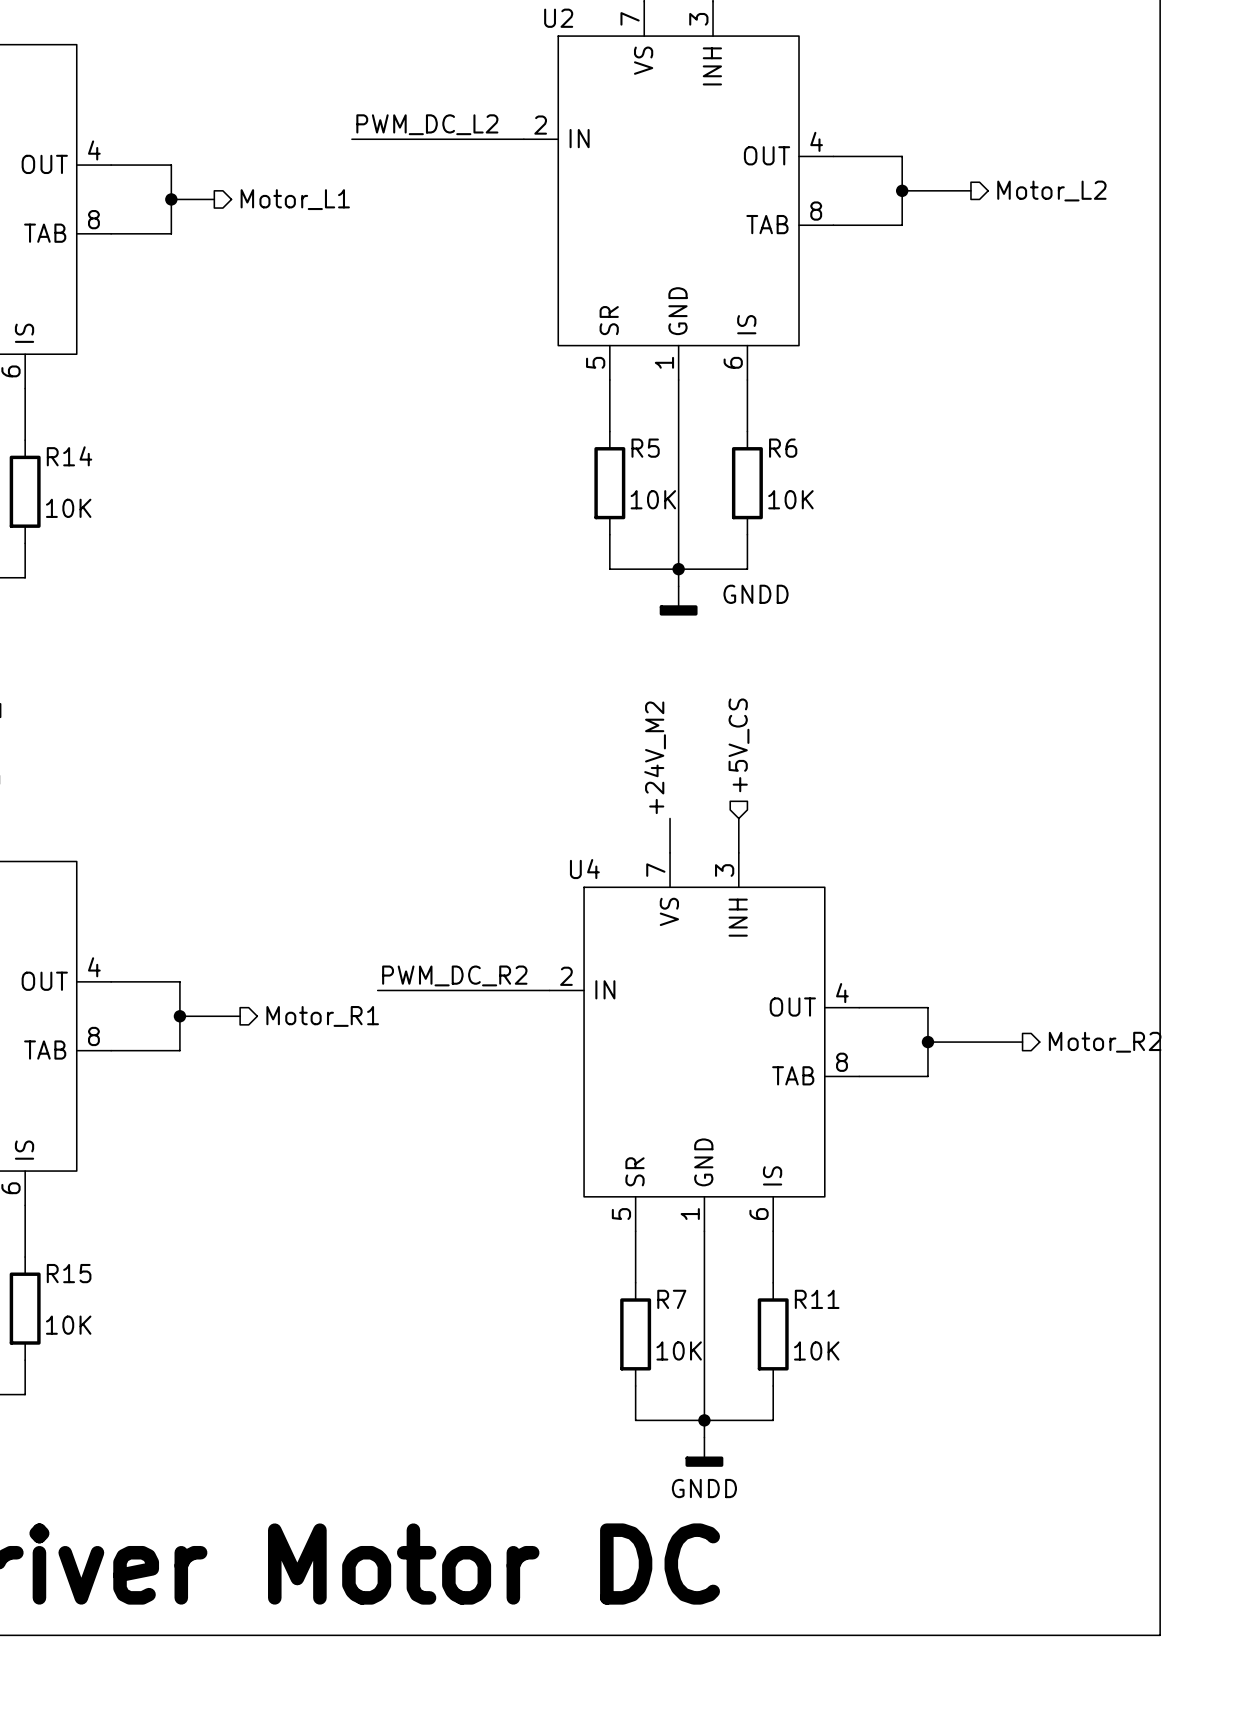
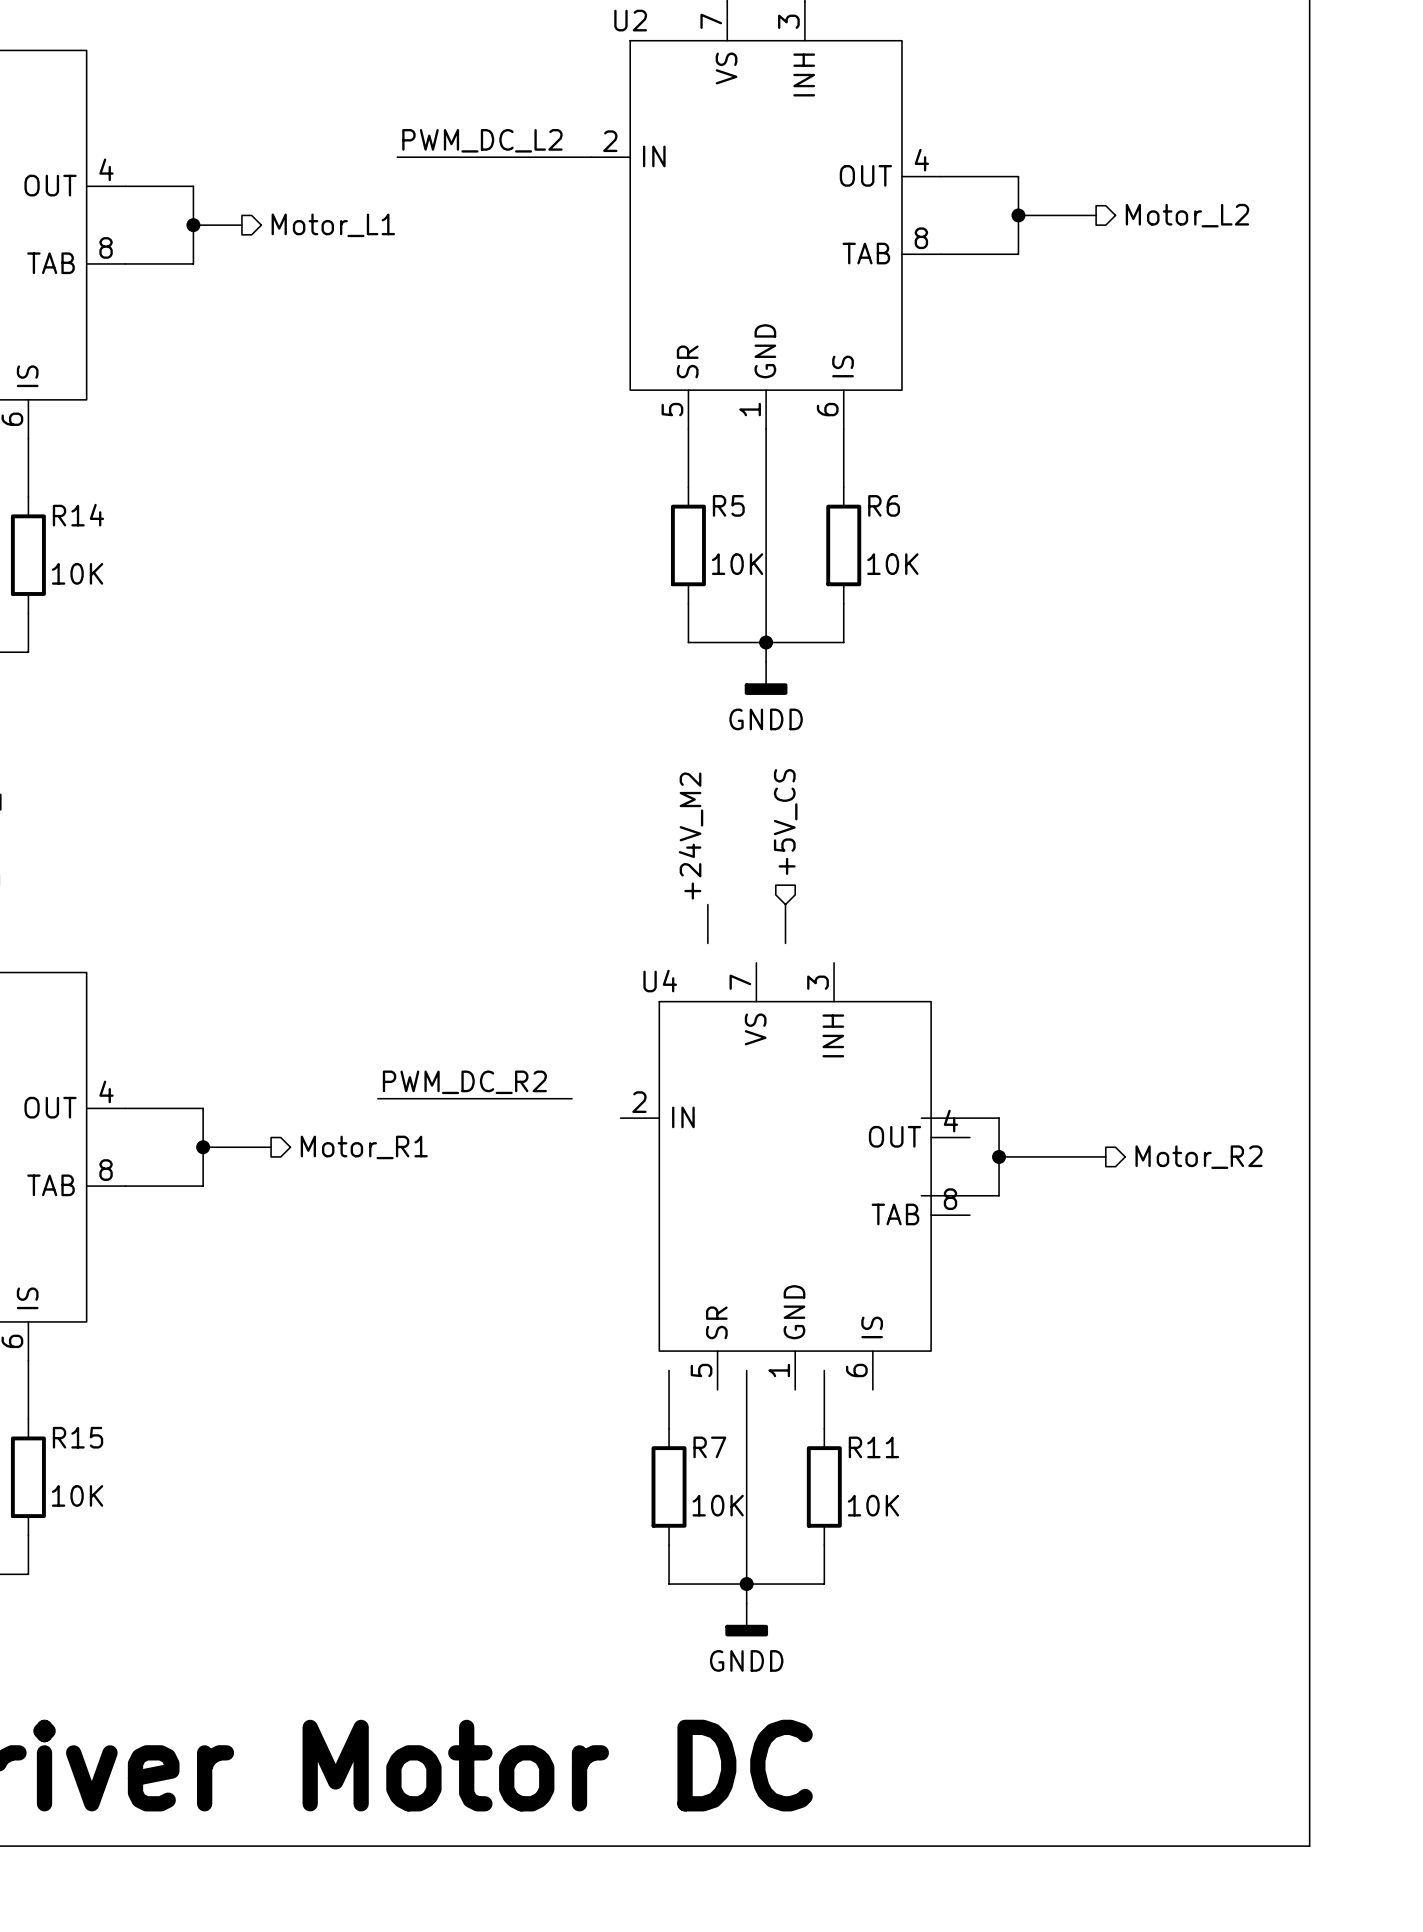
power symbol text position: GNDD (756, 594) -> GNDD (766, 719)
hierarchical label position: +5V_CS (738, 745) -> +5V_CS (785, 822)
label position: +24V_M2 (655, 757) -> +24V_M2 (690, 836)
wire: (670, 818) (670, 852) -> (707, 904) (707, 943)
wire: (738, 818) (738, 852) -> (785, 904) (785, 943)
label position: PWM_DC_R2 (454, 975) -> PWM_DC_R2 (464, 1082)
wire: (377, 990) (549, 990) -> (377, 1098) (571, 1098)
wire: (859, 1007) (927, 1007) (927, 1076) (859, 1076) -> (921, 1118) (999, 1118) (999, 1195) (921, 1195)
wire: (927, 1042) (1022, 1042) -> (999, 1156) (1105, 1156)
junction position: (927, 1042) -> (999, 1156)
hierarchical label position: Motor_R2 (1105, 1042) -> Motor_R2 (1199, 1157)
wire: (635, 1231) (635, 1282) -> (669, 1370) (669, 1428)
wire: (704, 1231) (704, 1437) -> (746, 1370) (746, 1603)
wire: (773, 1231) (773, 1282) -> (824, 1370) (824, 1428)
R7 position: (635, 1334) -> (669, 1486)
R11 position: (773, 1334) -> (824, 1486)
wire: (635, 1385) (635, 1420) (773, 1420) (773, 1385) -> (669, 1545) (669, 1584) (824, 1584) (824, 1545)
junction position: (704, 1420) -> (746, 1584)
power symbol position: GNDD (704, 1452) -> GNDD (746, 1619)

